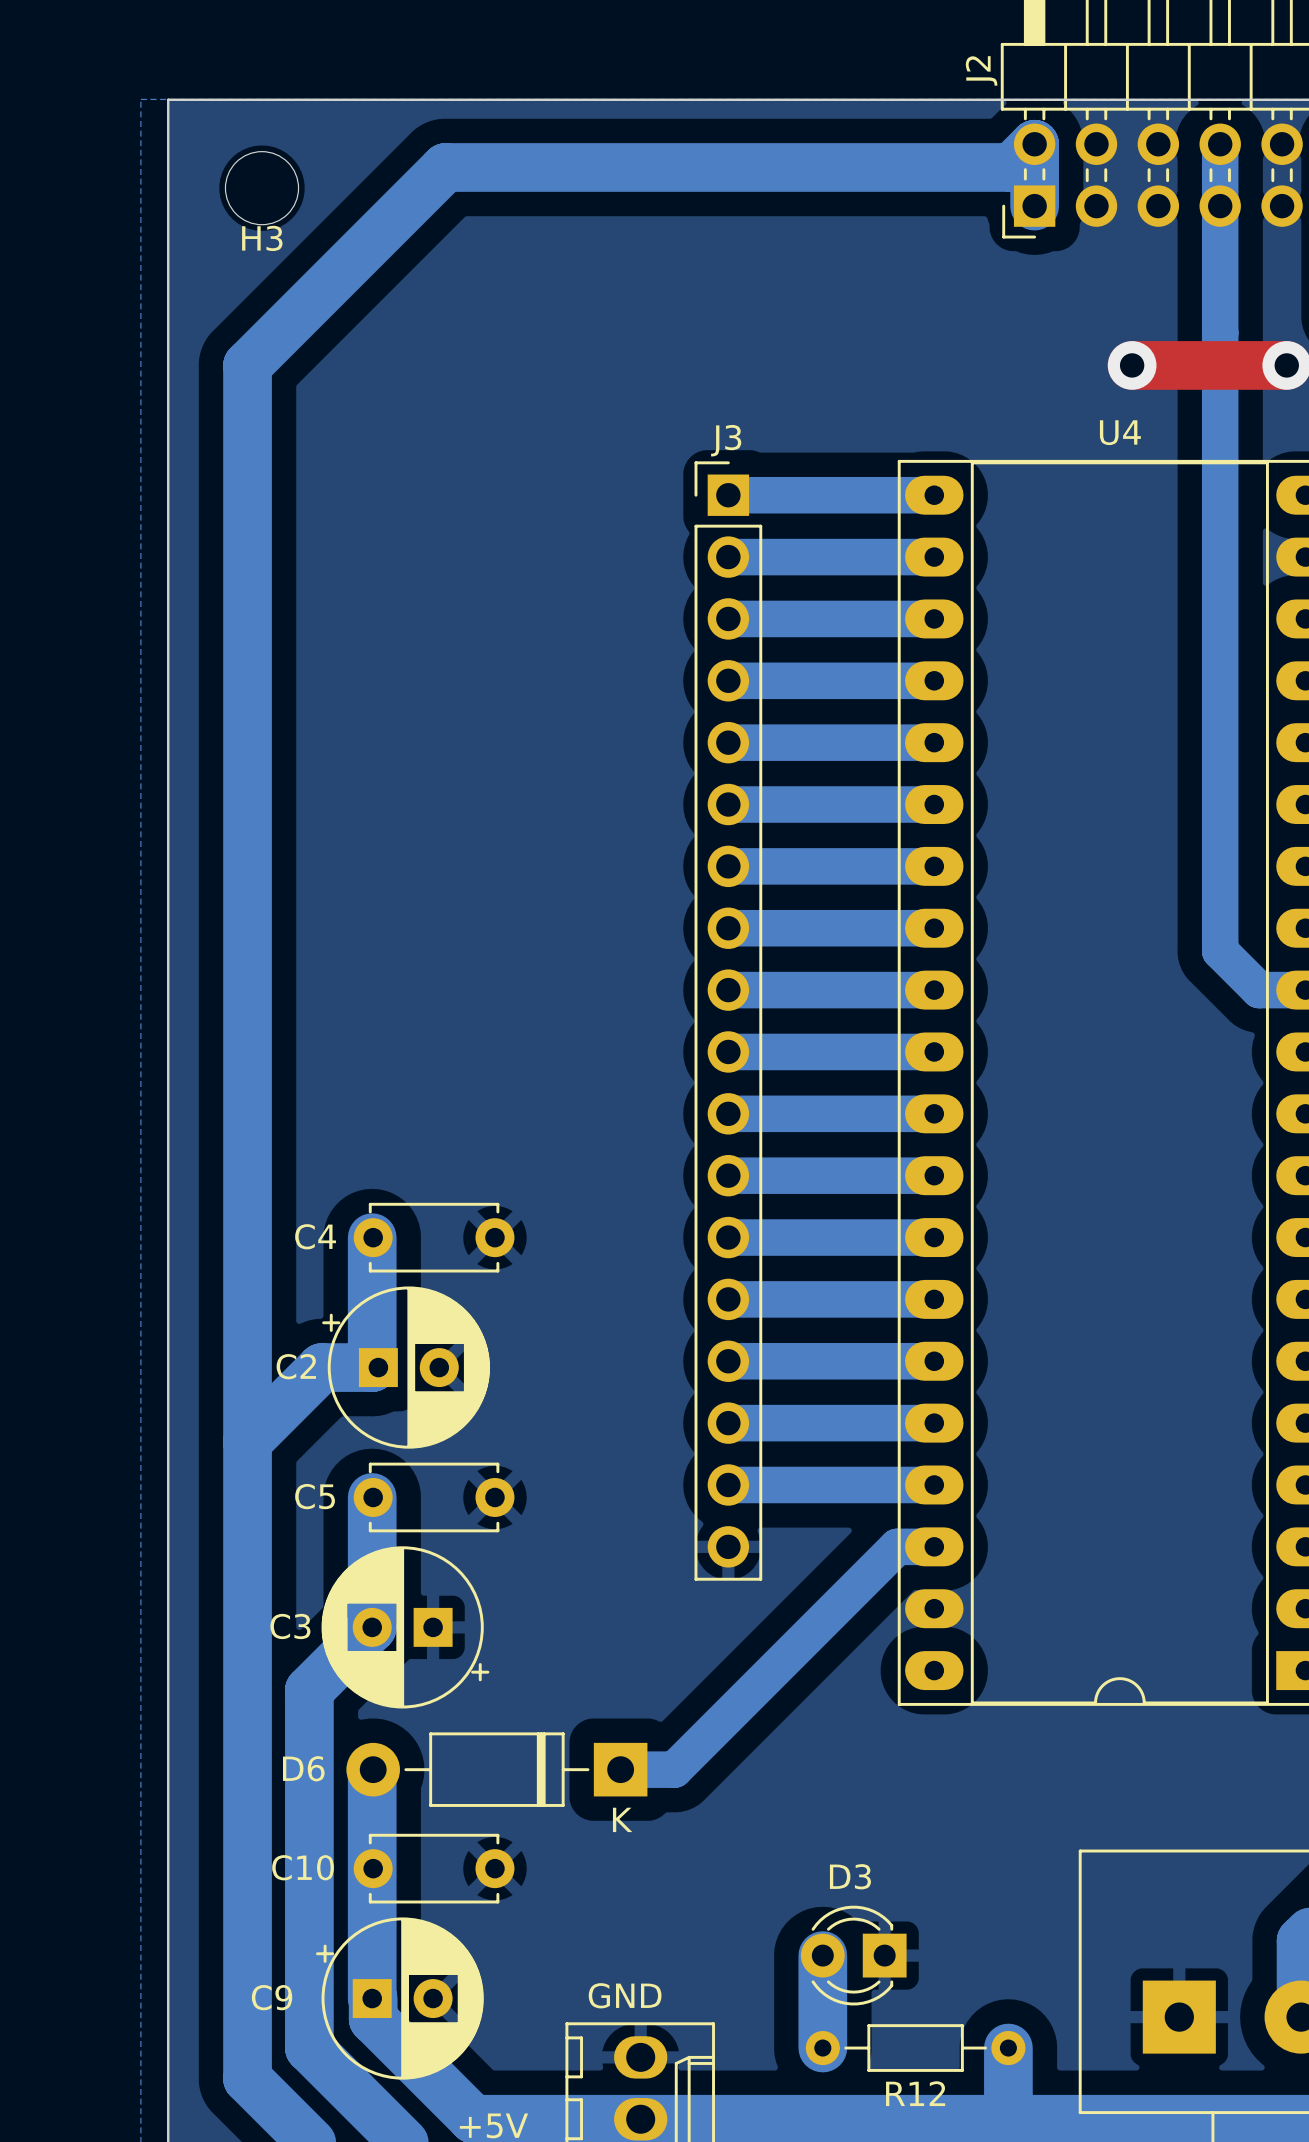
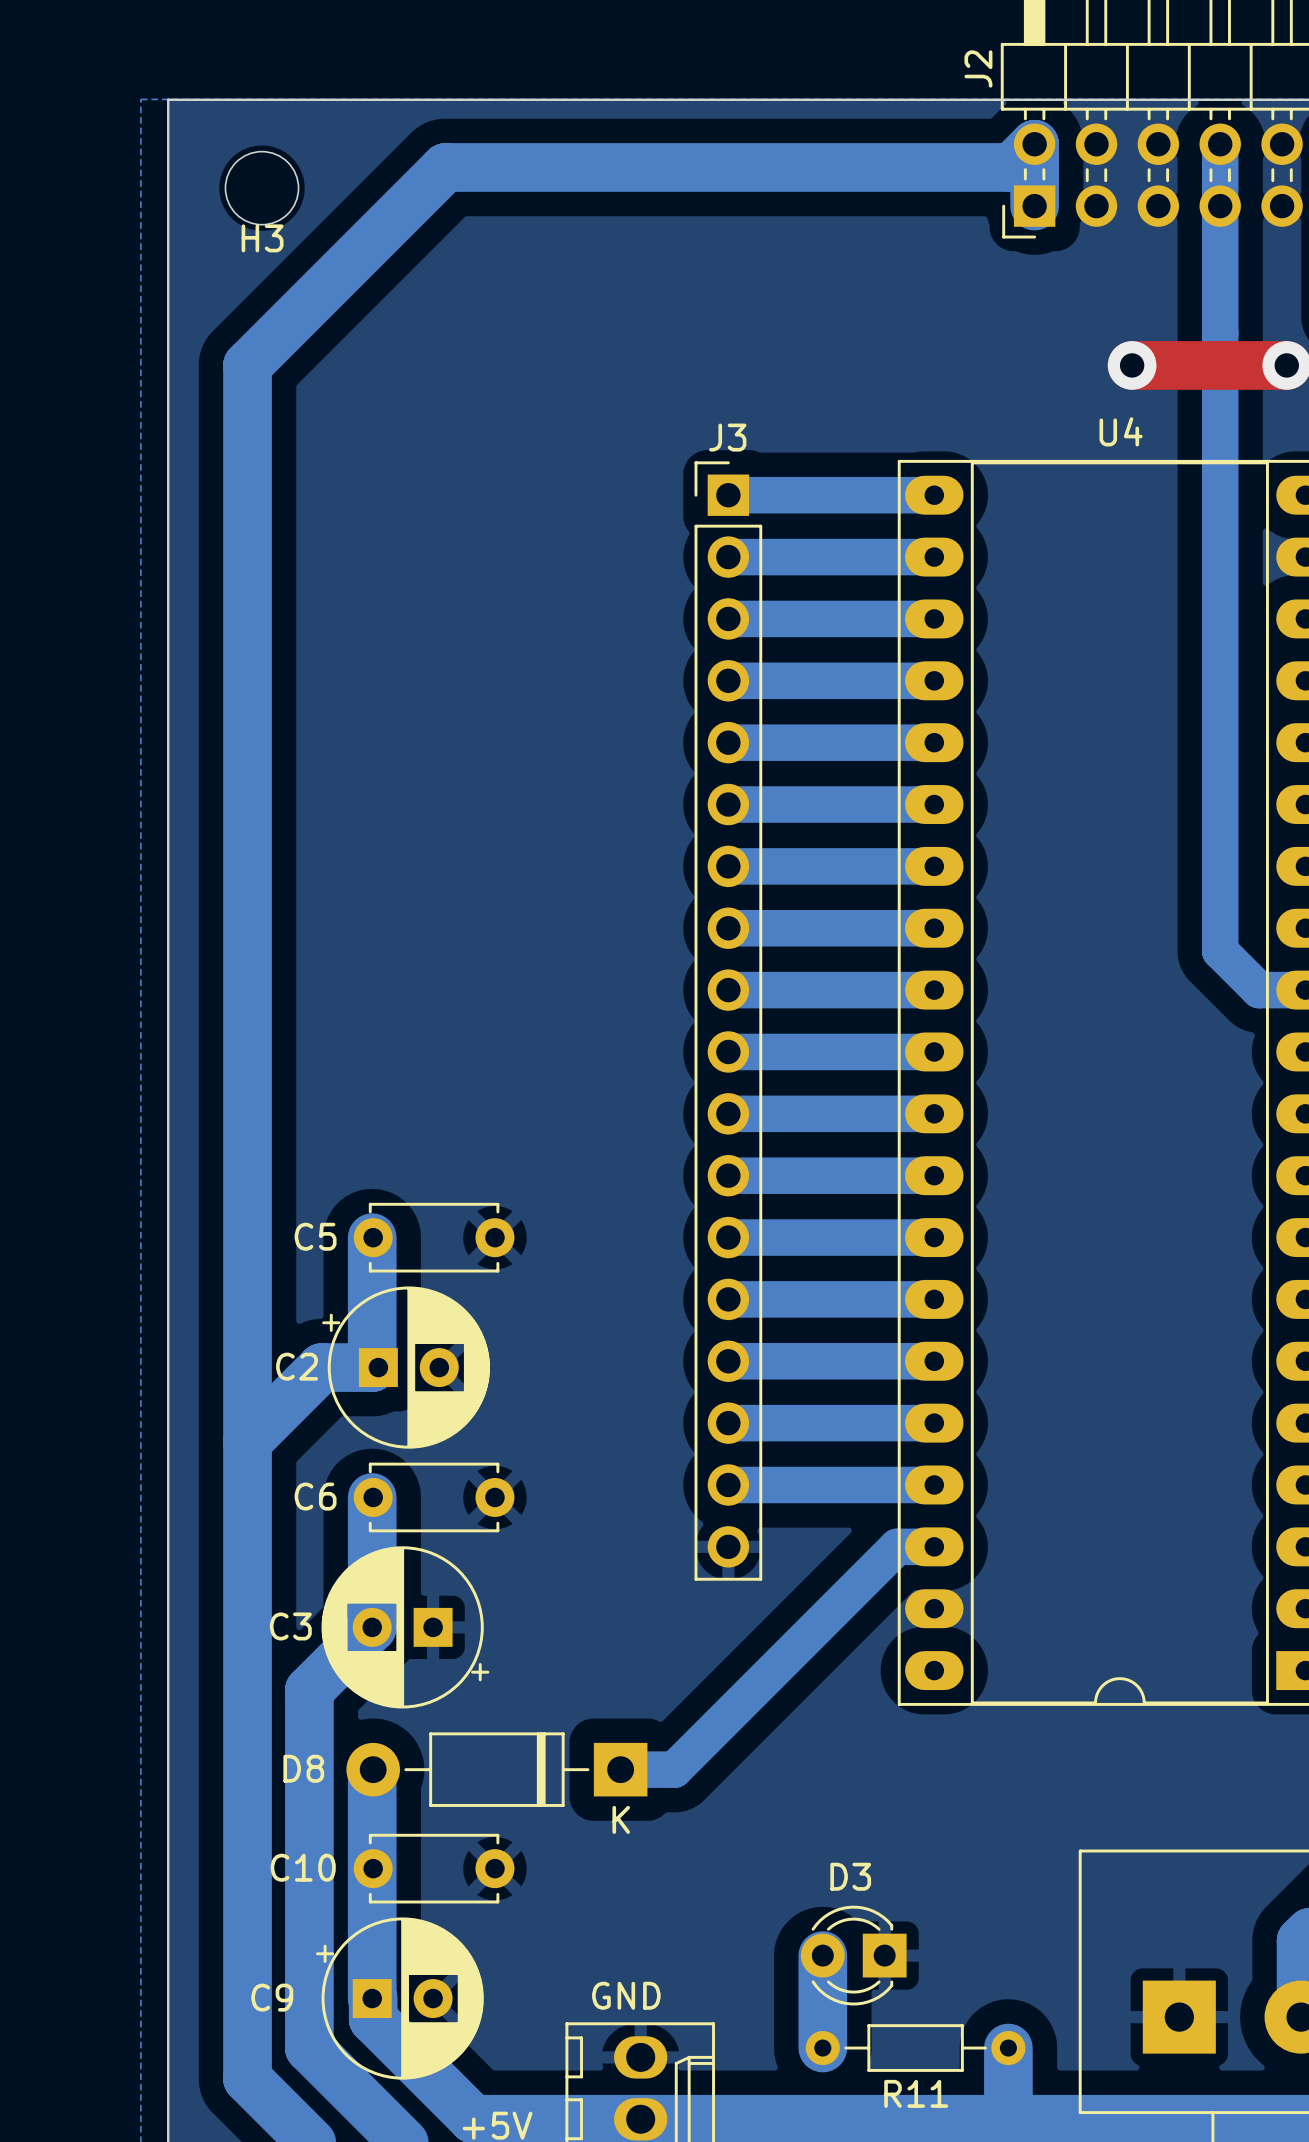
C4 name: C4 (315, 1236) -> C5 (315, 1236)
C5 name: C5 (315, 1496) -> C6 (315, 1496)
D6 name: D6 (303, 1768) -> D8 (303, 1768)
R12 name: R12 (915, 2093) -> R11 (916, 2093)

